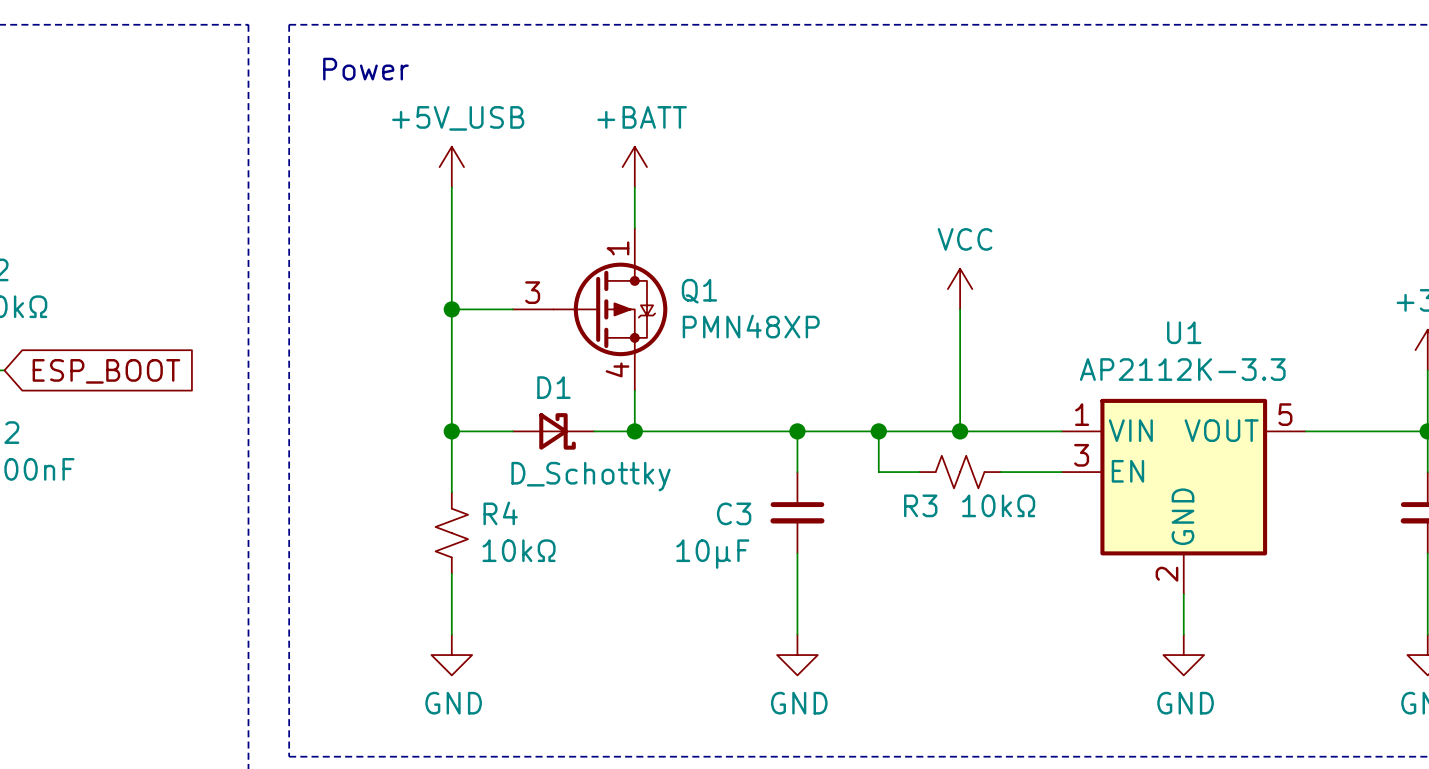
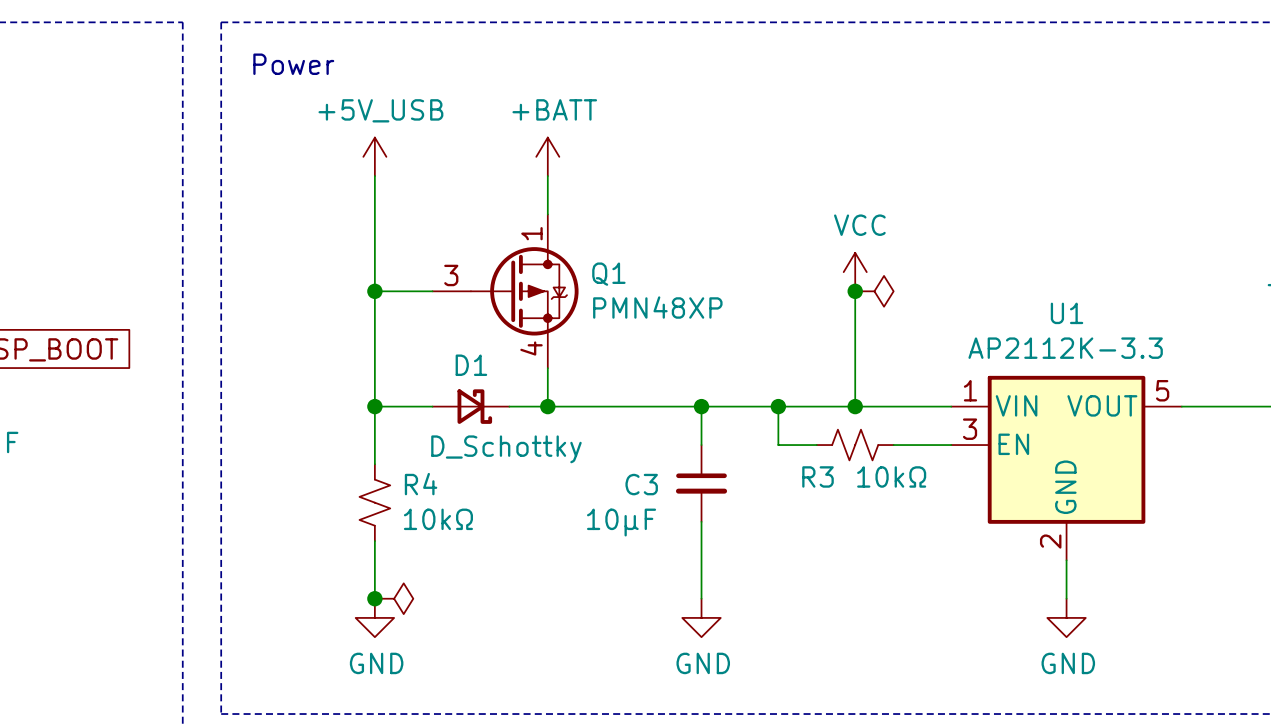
junction: none -> (855, 291)
power symbol: none -> (874, 291)
junction: none -> (374, 598)
power symbol: none -> (394, 598)

